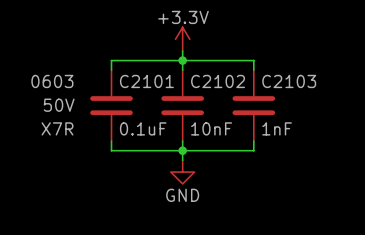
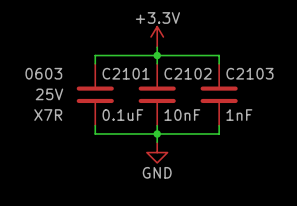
C2101 text: 50V (59, 105) -> 25V (49, 94)

